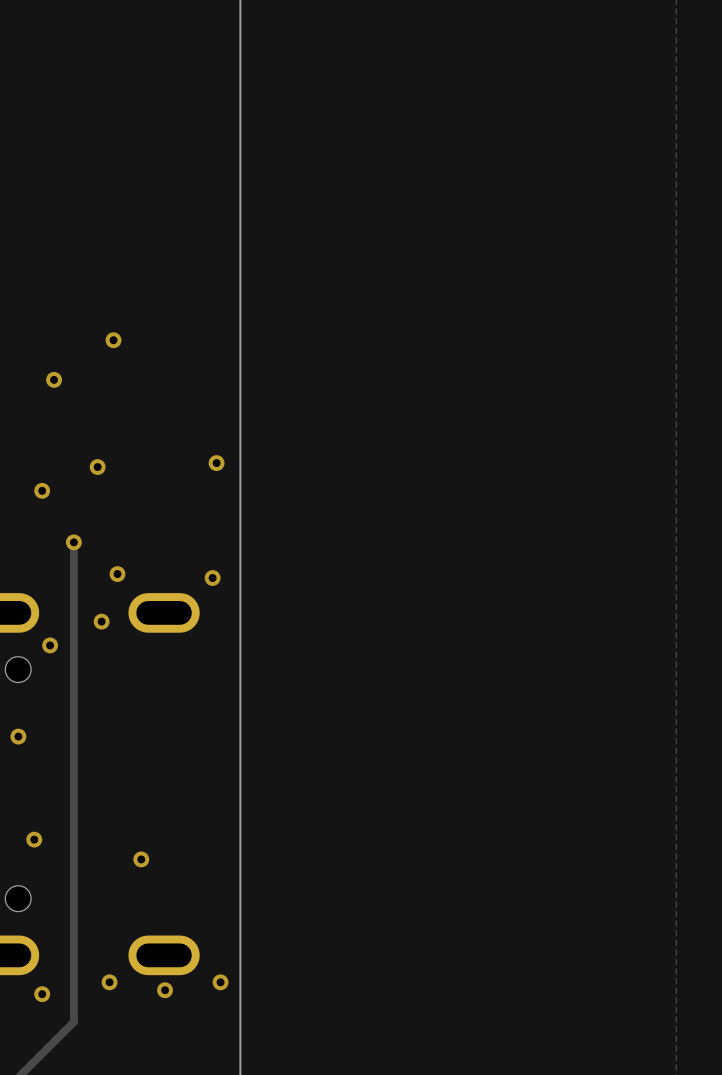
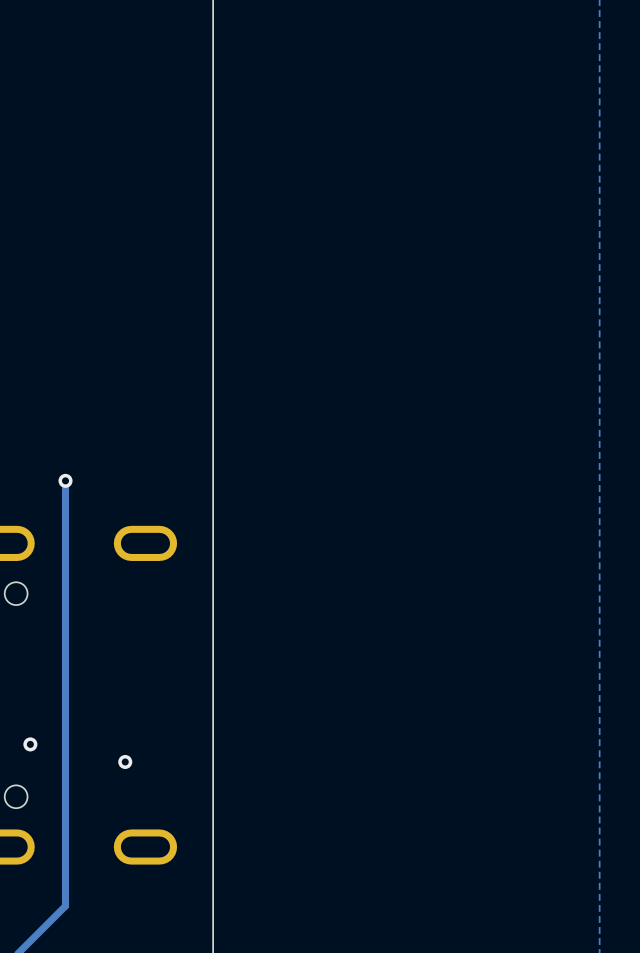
via: (113, 340) -> none
via: (54, 379) -> none
via: (216, 463) -> none
via: (97, 467) -> none
via: (42, 490) -> none
via: (117, 574) -> none
via: (212, 578) -> none
via: (101, 621) -> none
via: (50, 645) -> none
via: (18, 736) -> none
via: (109, 982) -> none
via: (220, 982) -> none
via: (165, 990) -> none
via: (42, 994) -> none

